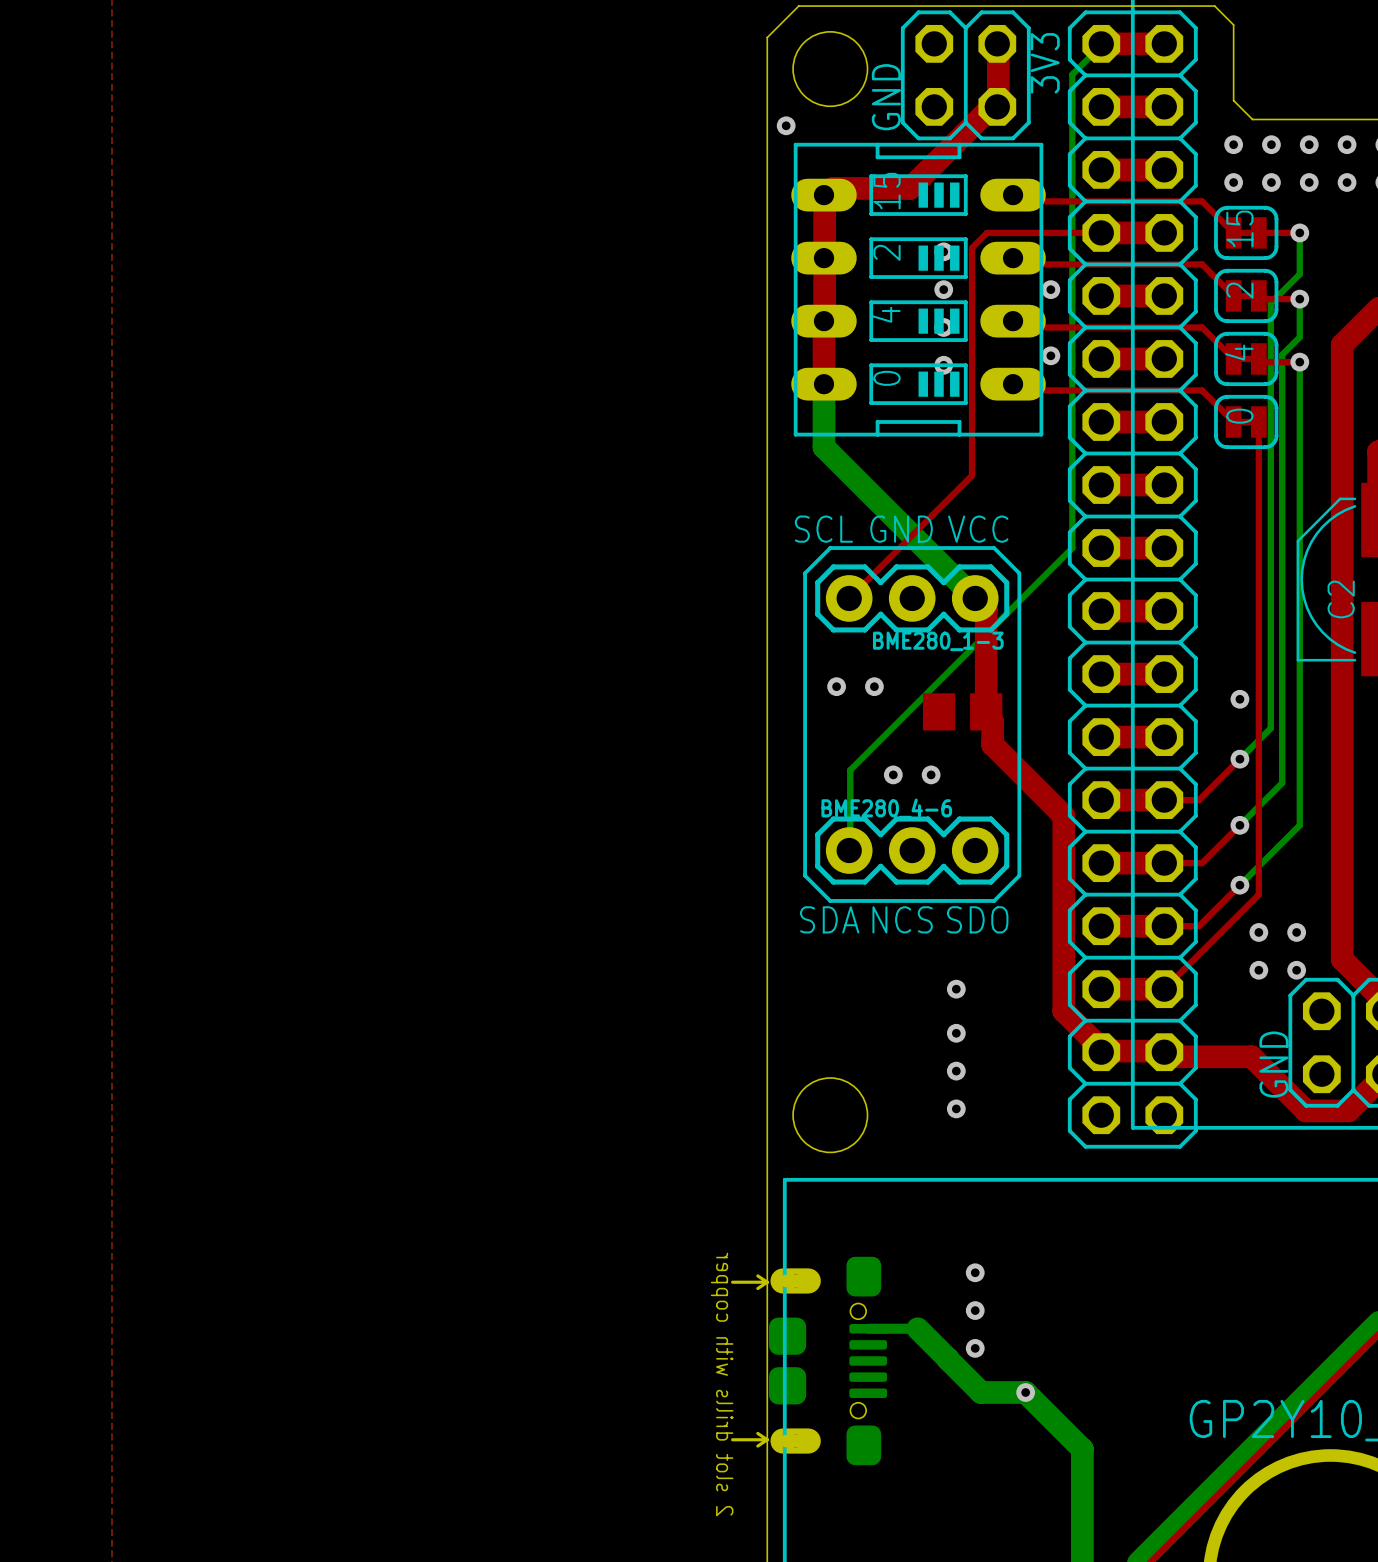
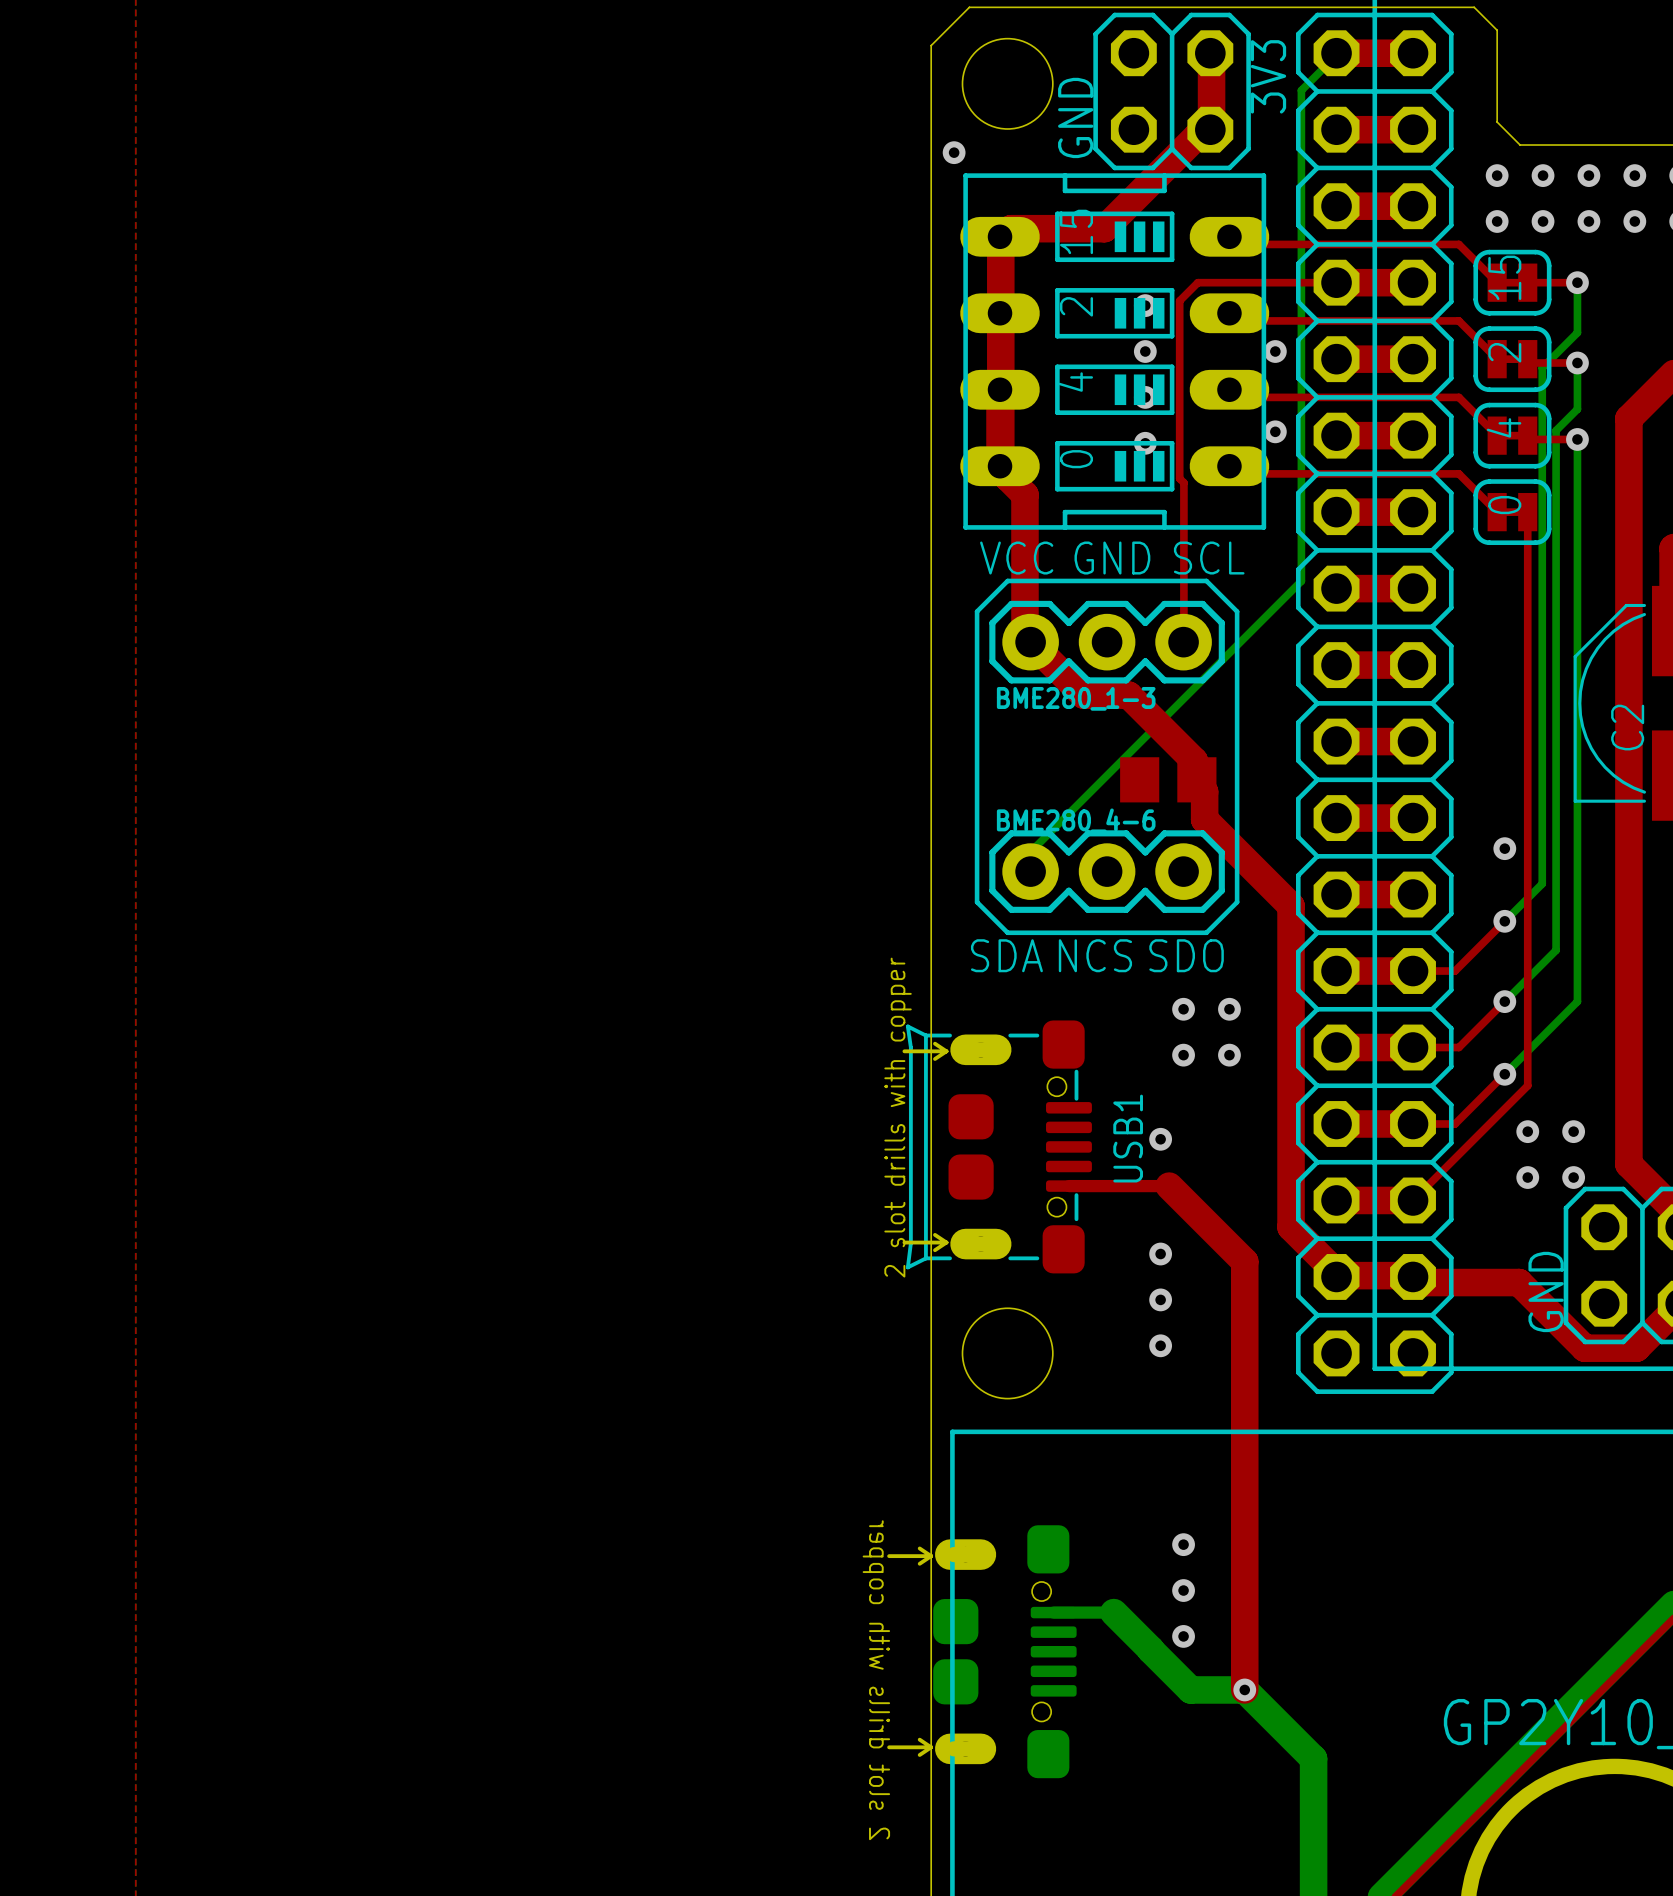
bottom track: (823, 384) (823, 447) (975, 598) -> none
top track: (972, 394) (972, 475) (849, 598) -> (1179, 478) (1183, 482) (1183, 642)
bottom track: (1072, 478) (1072, 548) (850, 770) (849, 850) -> (1301, 581) (1031, 850) (1030, 871)
text position: SCL (823, 529) -> SCL (1209, 558)
text position: GND (901, 529) -> GND (1112, 558)
text position: VCC (978, 529) -> VCC (1016, 558)
line: (805, 573) (830, 548) (994, 548) (1019, 573) -> (977, 695) (977, 611) (1007, 580) (1206, 580) (1237, 611) (1237, 695)
BME280_1-3 position: (912, 598) -> (1107, 642)
top track: (975, 598) (986, 609) (986, 711) -> none
BME280_1-3 name position: BME280_1-3 (938, 641) -> BME280_1-3 (1076, 698)
via: (836, 686) -> none
via: (874, 686) -> none
part position: (962, 711) -> (1168, 779)
top track: (985, 712) (992, 721) (992, 744) (1063, 815) -> (1000, 391) (1000, 466) (1007, 477) (1024, 494) (1024, 629) (1030, 642) (1083, 695) (1128, 695) (1194, 760) (1194, 778) (1204, 791) (1204, 819) (1291, 905) (1291, 990)
line: (805, 743) (805, 875) (830, 900) (994, 900) (1019, 875) (1019, 743) -> (977, 902) (1007, 932) (1206, 932) (1237, 902)
via: (893, 774) -> none
via: (931, 774) -> none
via: none -> (1183, 1009)
via: none -> (1229, 1009)
BME280_4-6 position: (912, 850) -> (1107, 871)
via: none -> (1183, 1055)
via: none -> (1229, 1055)
text position: SDA (829, 919) -> SDA (1006, 955)
text position: NCS (902, 919) -> NCS (1095, 955)
text position: SDO (977, 919) -> SDO (1186, 955)
USB1: none -> (997, 1146)
top track: none -> (1068, 1186) (1169, 1186) (1244, 1261) (1244, 1689)
via position: (956, 989) -> (1160, 1139)

